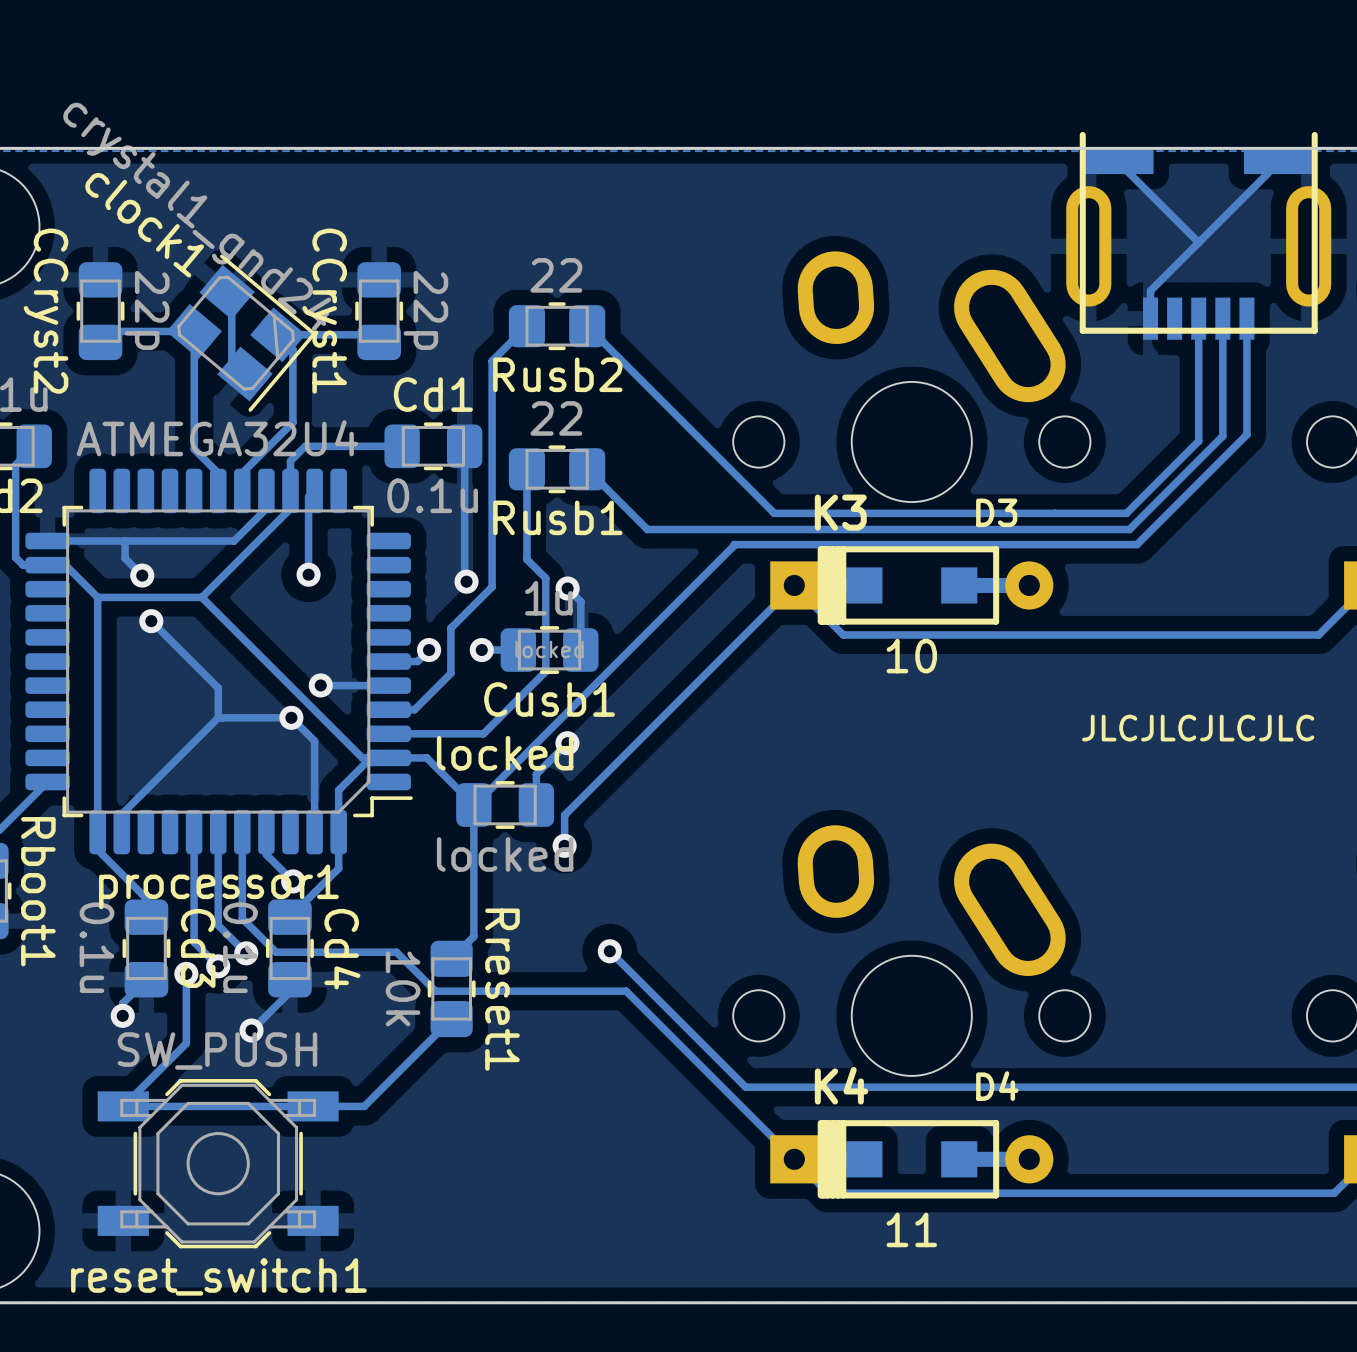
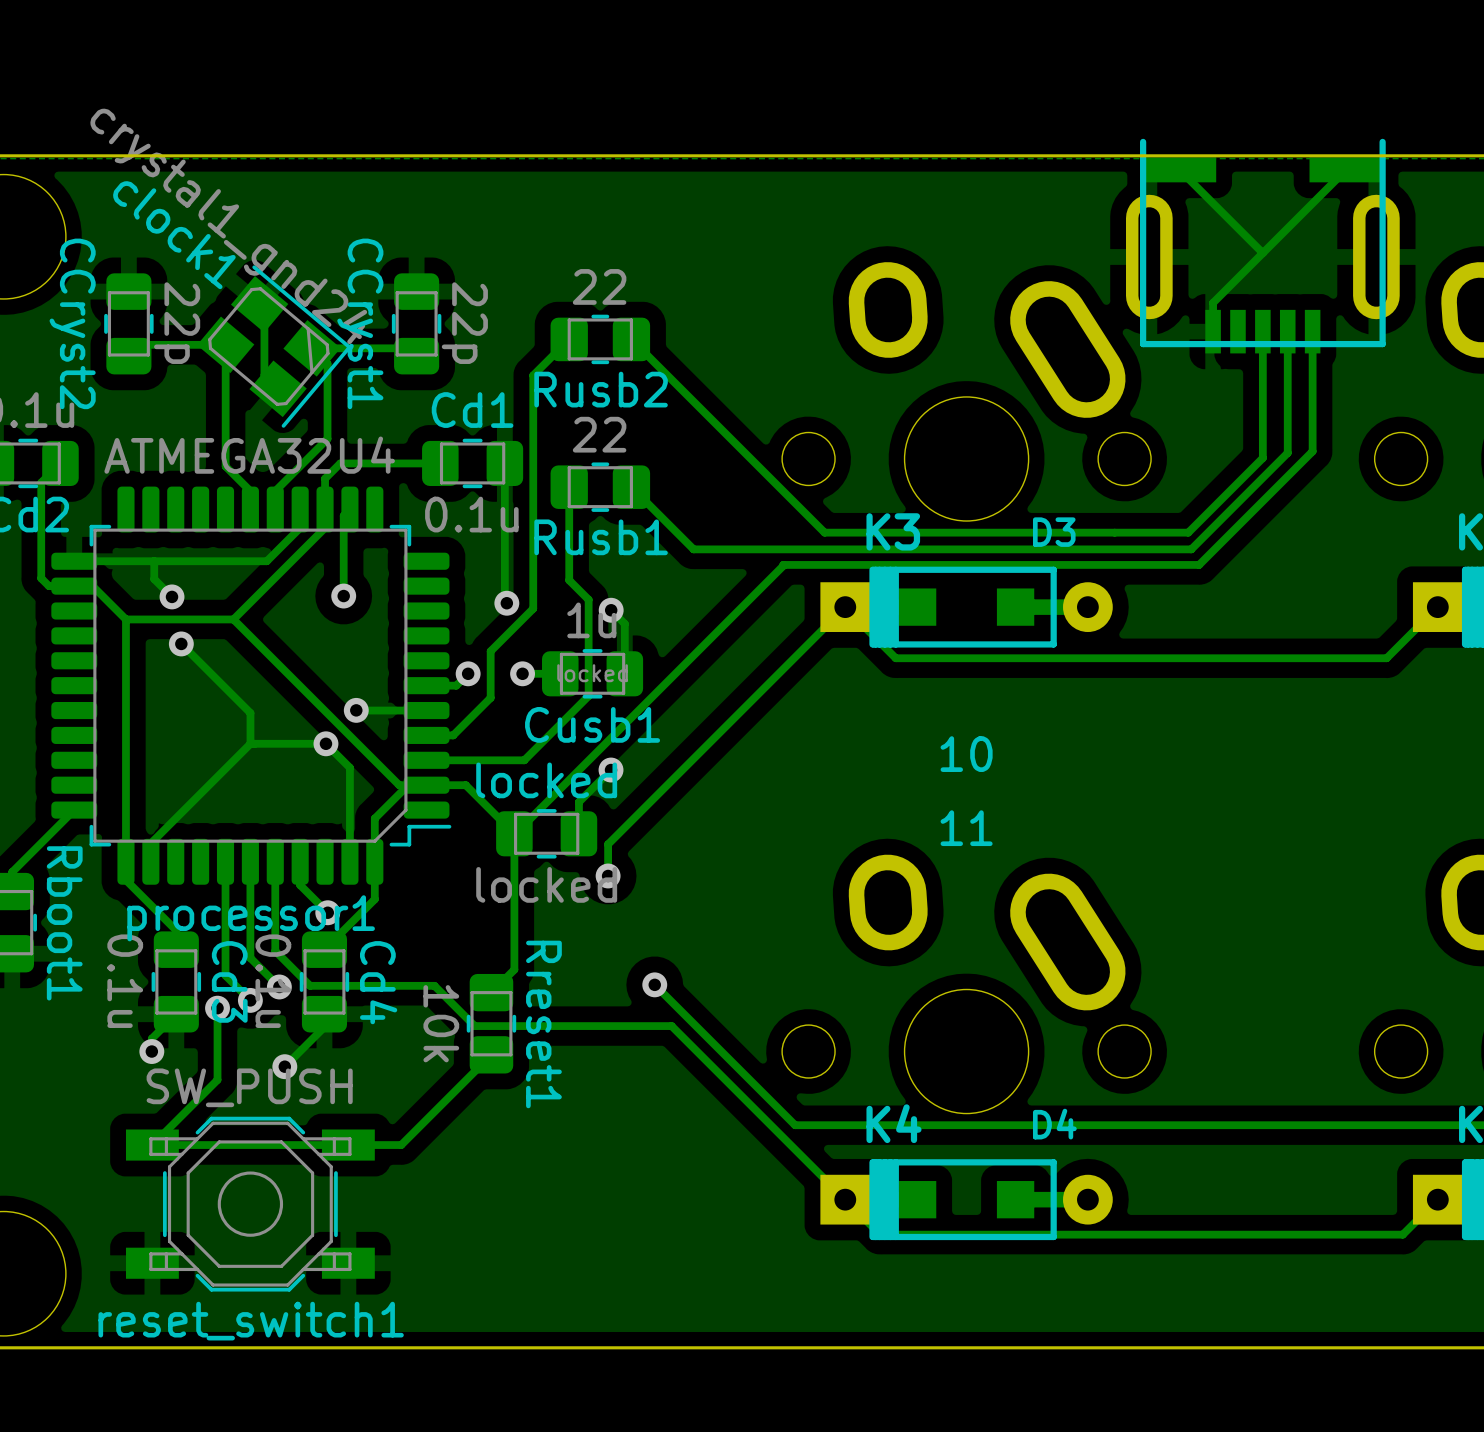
text position: 10 (911, 656) -> 10 (966, 754)
text: JLCJLCJLCJLC (1198, 728) -> none
text position: 11 (911, 1229) -> 11 (966, 828)

